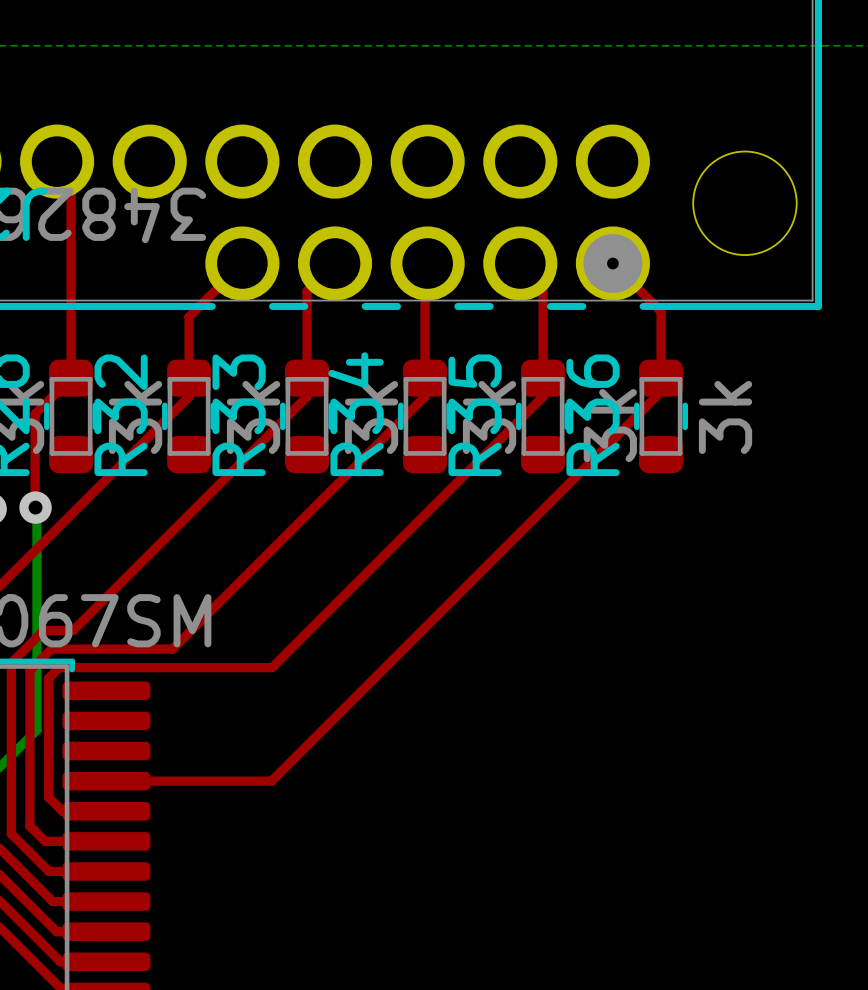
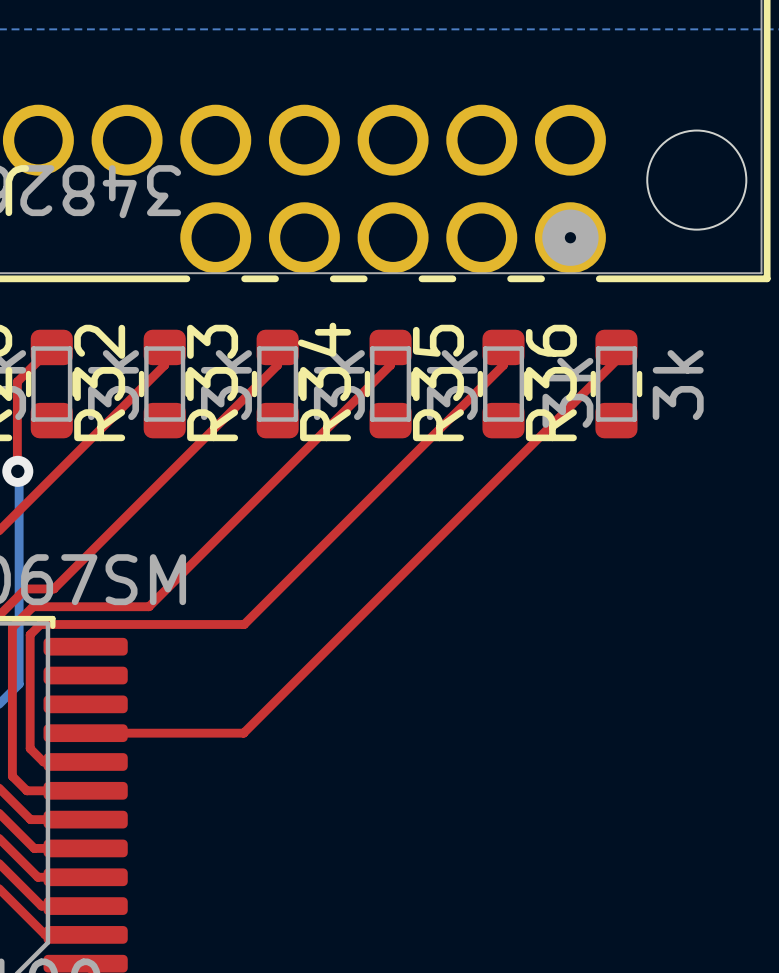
top track: (57, 161) (71, 175) (71, 378) -> none
top track: (242, 263) (189, 316) (189, 378) -> none
top track: (335, 263) (307, 291) (307, 378) -> none
top track: (427, 263) (425, 266) (425, 378) -> none
top track: (520, 263) (543, 286) (543, 378) -> none
top track: (612, 263) (661, 311) (661, 378) -> none

